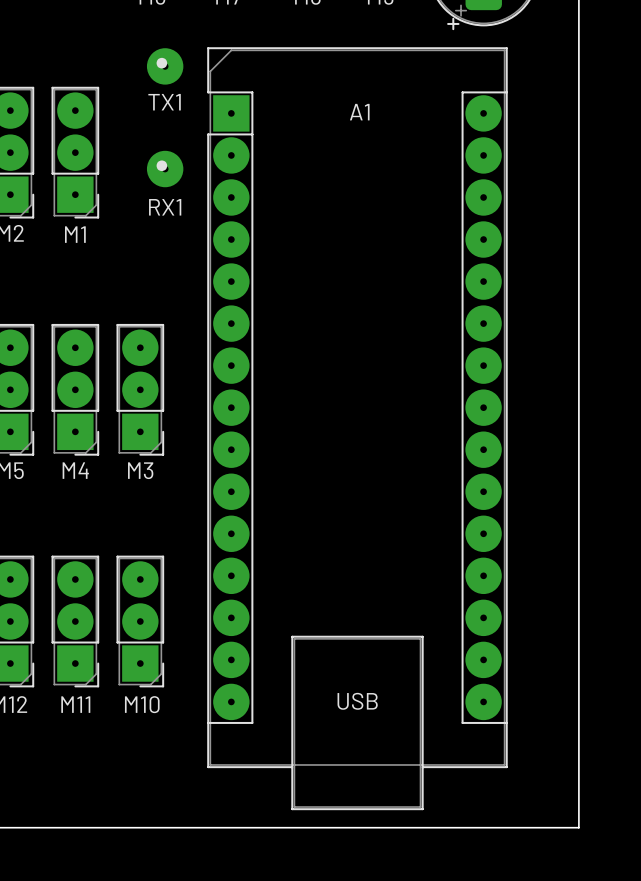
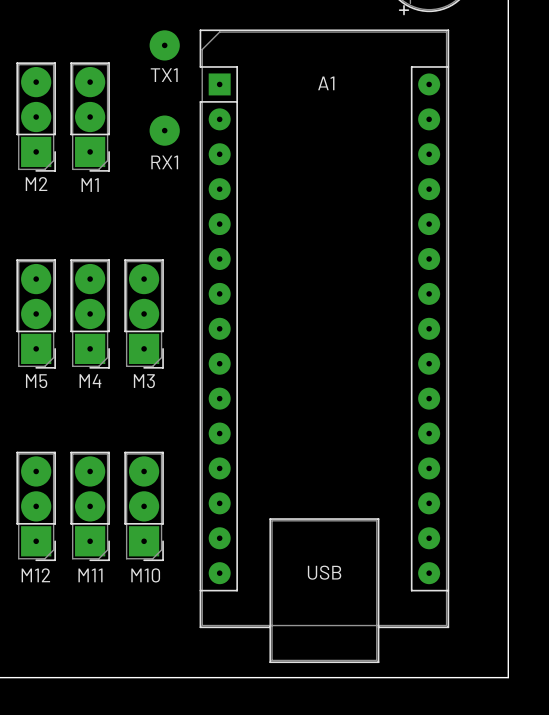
A1 footprint: [207, 47, 508, 811] -> [199, 29, 450, 664]
text: . (161, 63) -> none
text: . (161, 165) -> none

